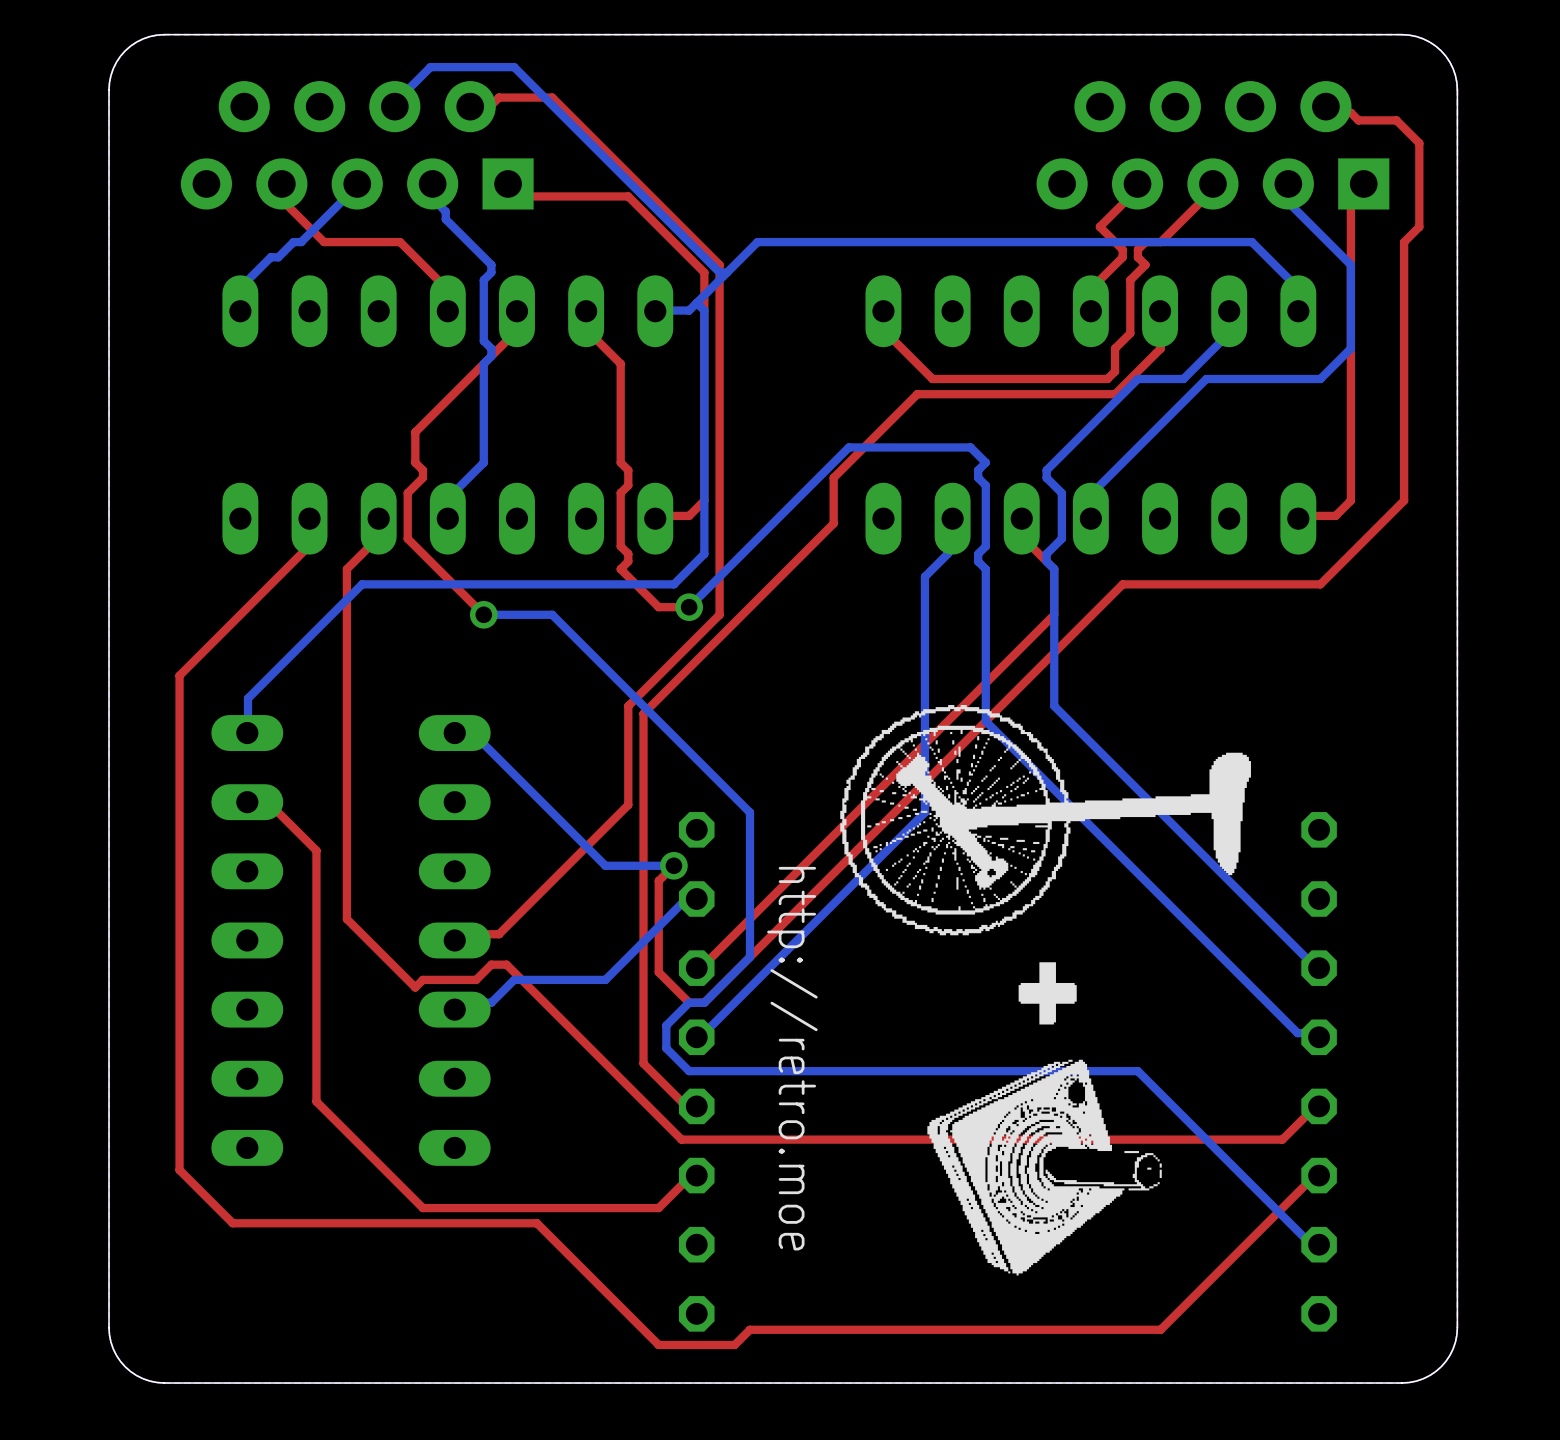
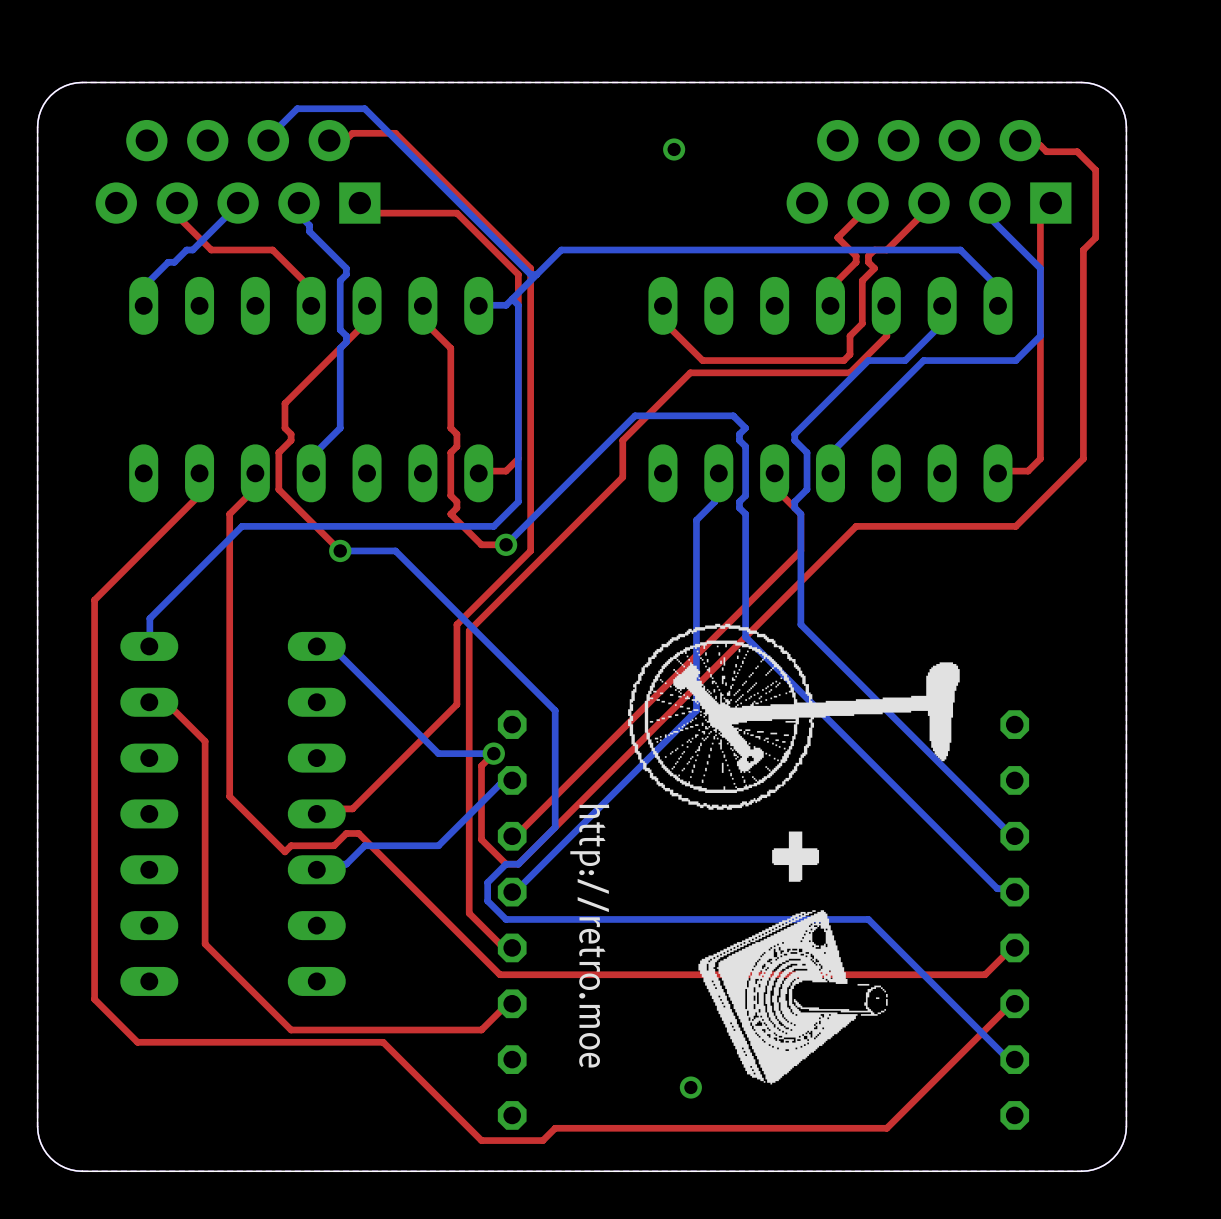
via: none -> (674, 149)
via: none -> (690, 1087)

